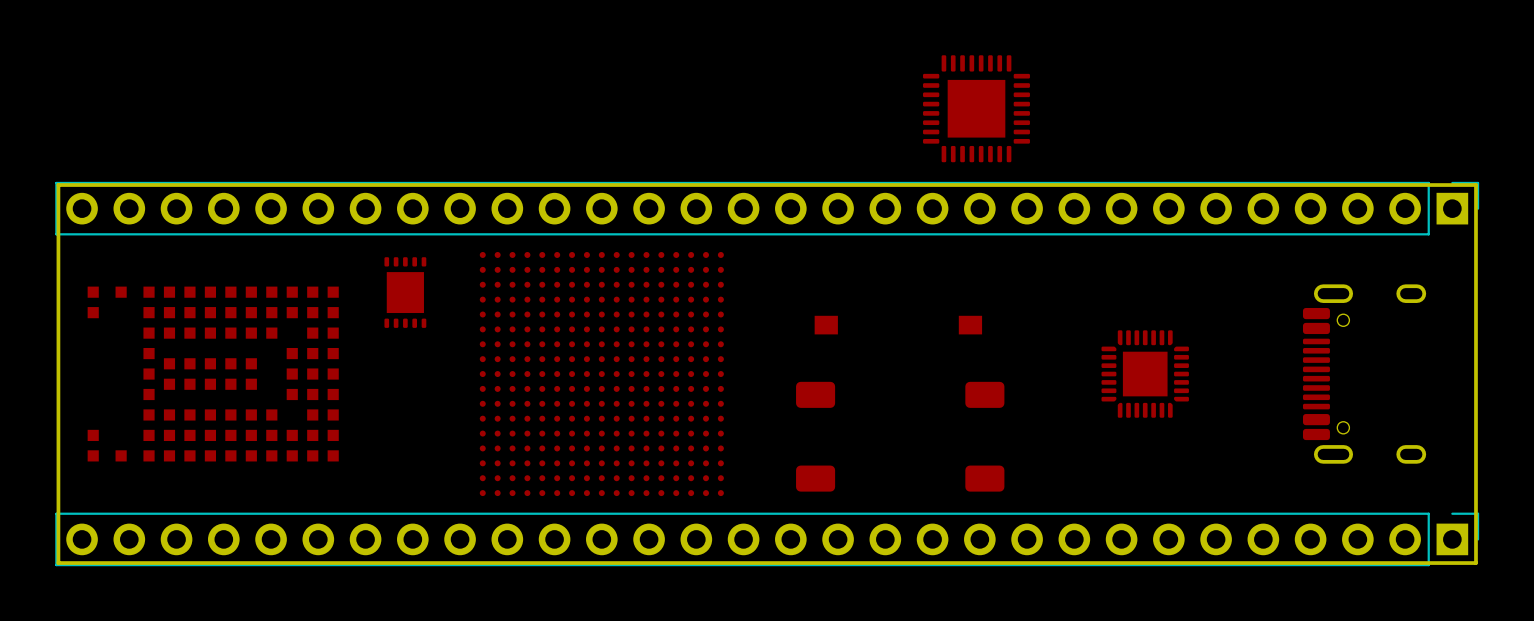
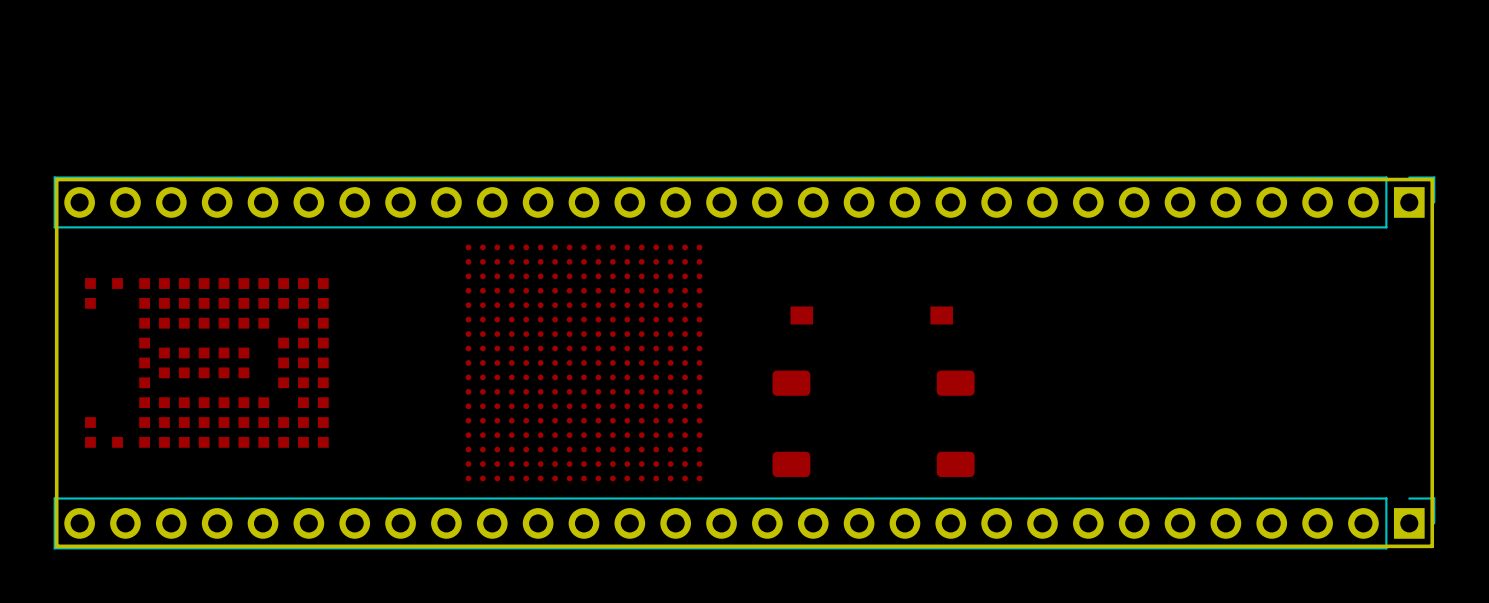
part: (976, 108) -> none
part: (405, 292) -> none
part: (1145, 374) -> none
part: (1364, 374) -> none

